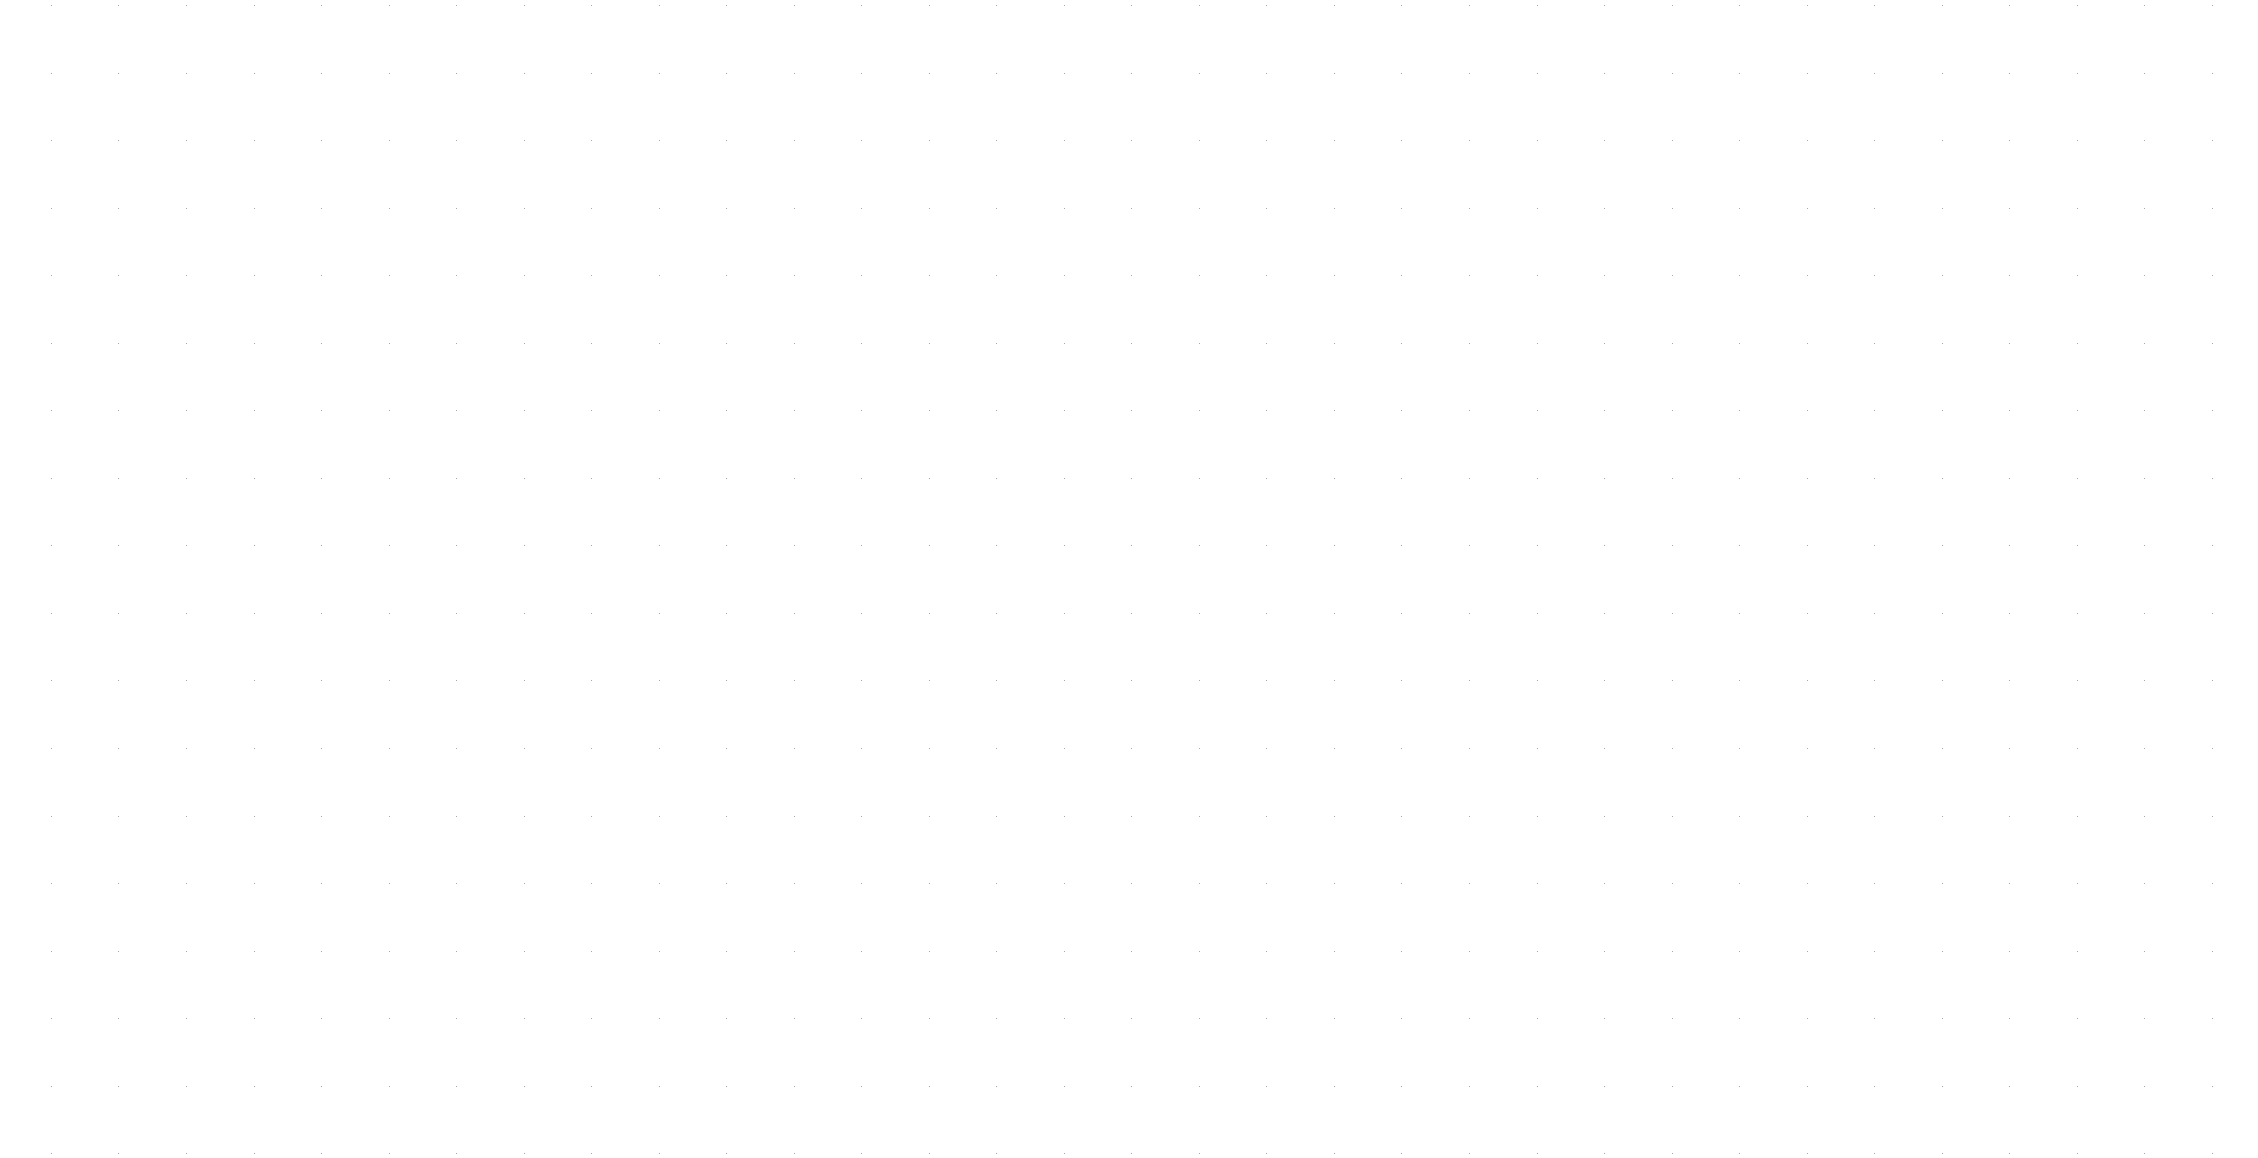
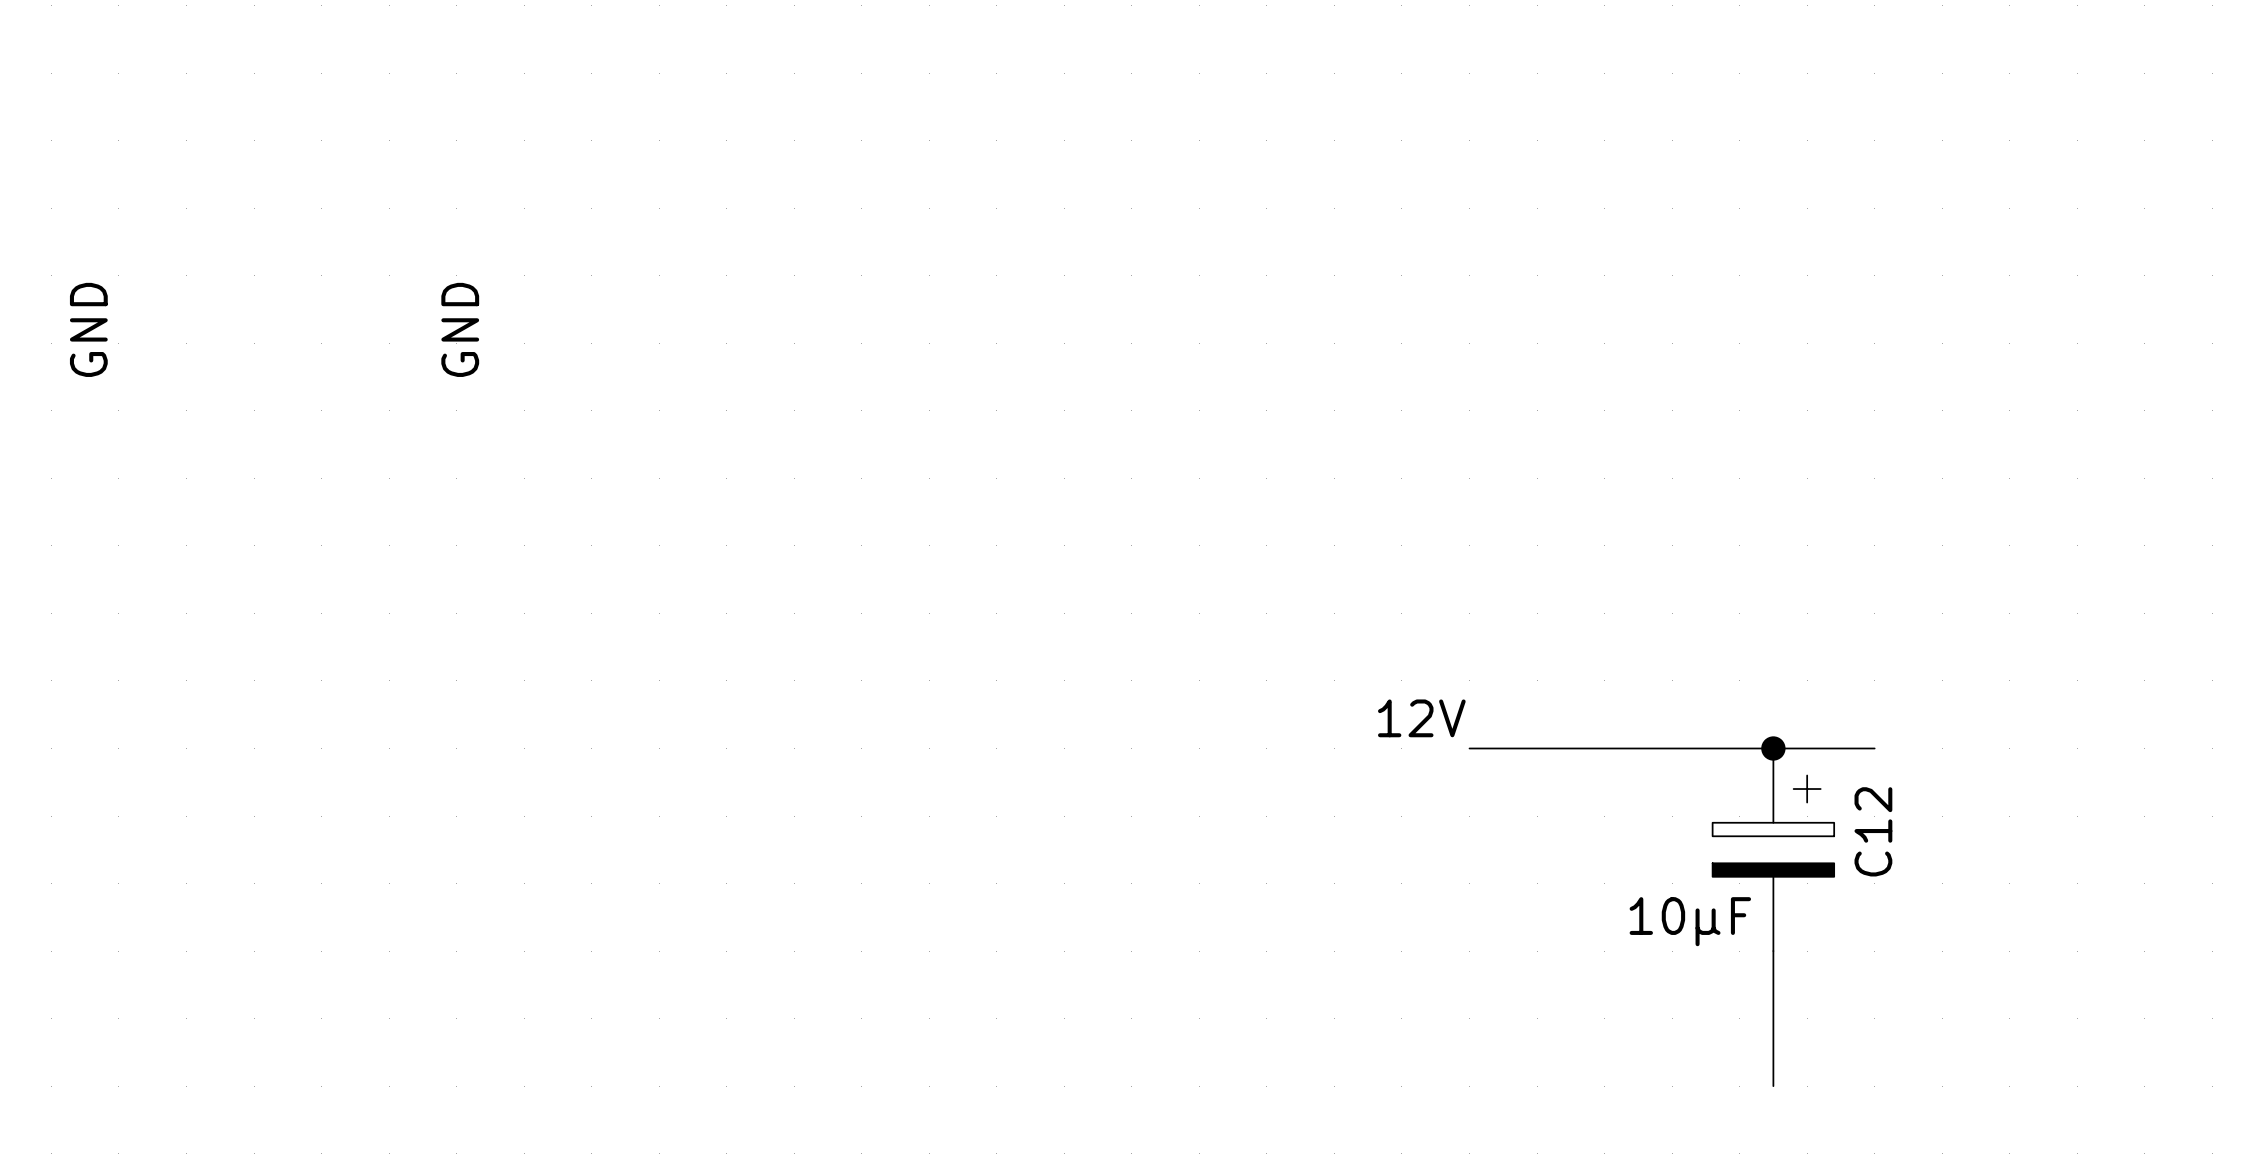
label: none -> GND (88, 329)
label: none -> GND (460, 329)
label: none -> 12V (1421, 718)
wire: none -> (1469, 748) (1874, 748)
junction: none -> (1773, 748)
C12: none -> (1773, 849)
wire: none -> (1773, 951) (1773, 1086)

